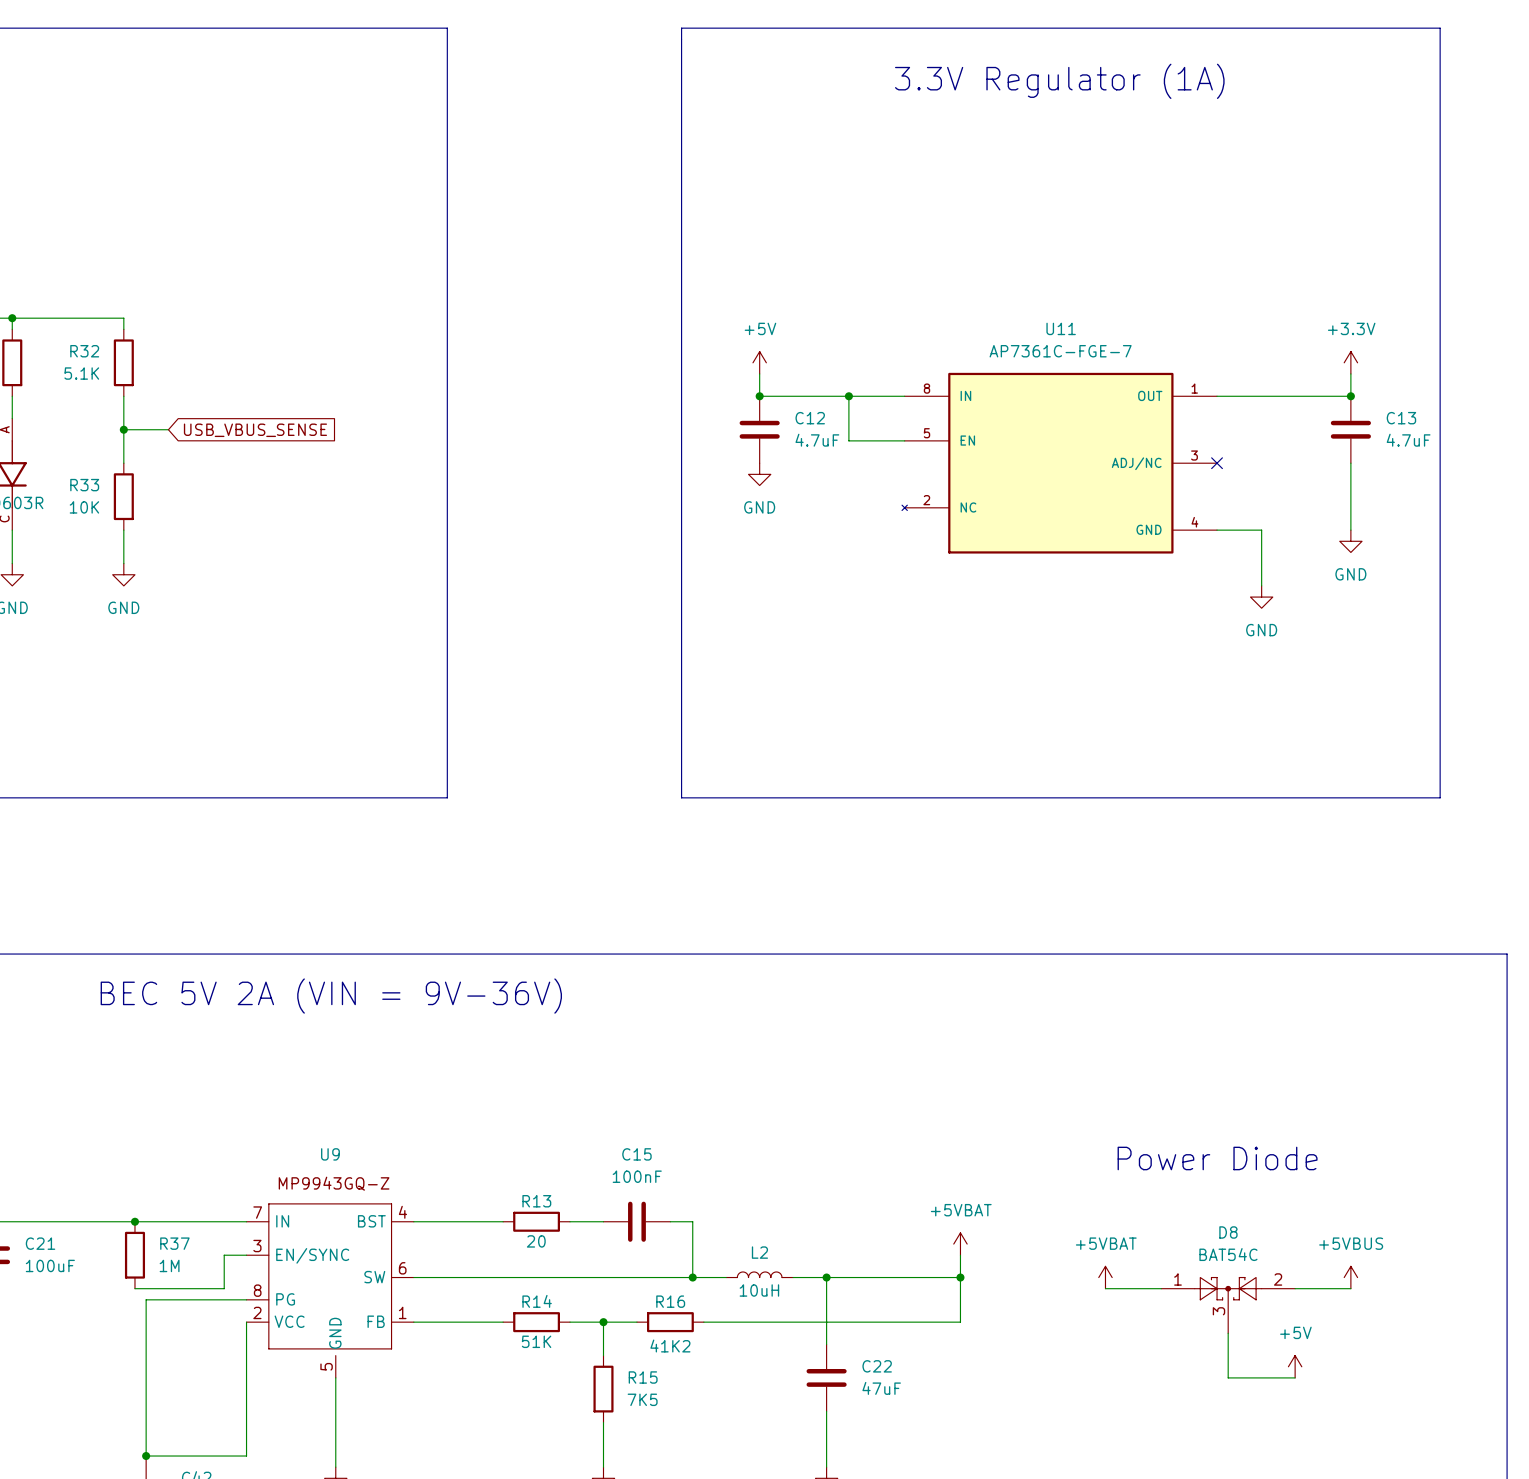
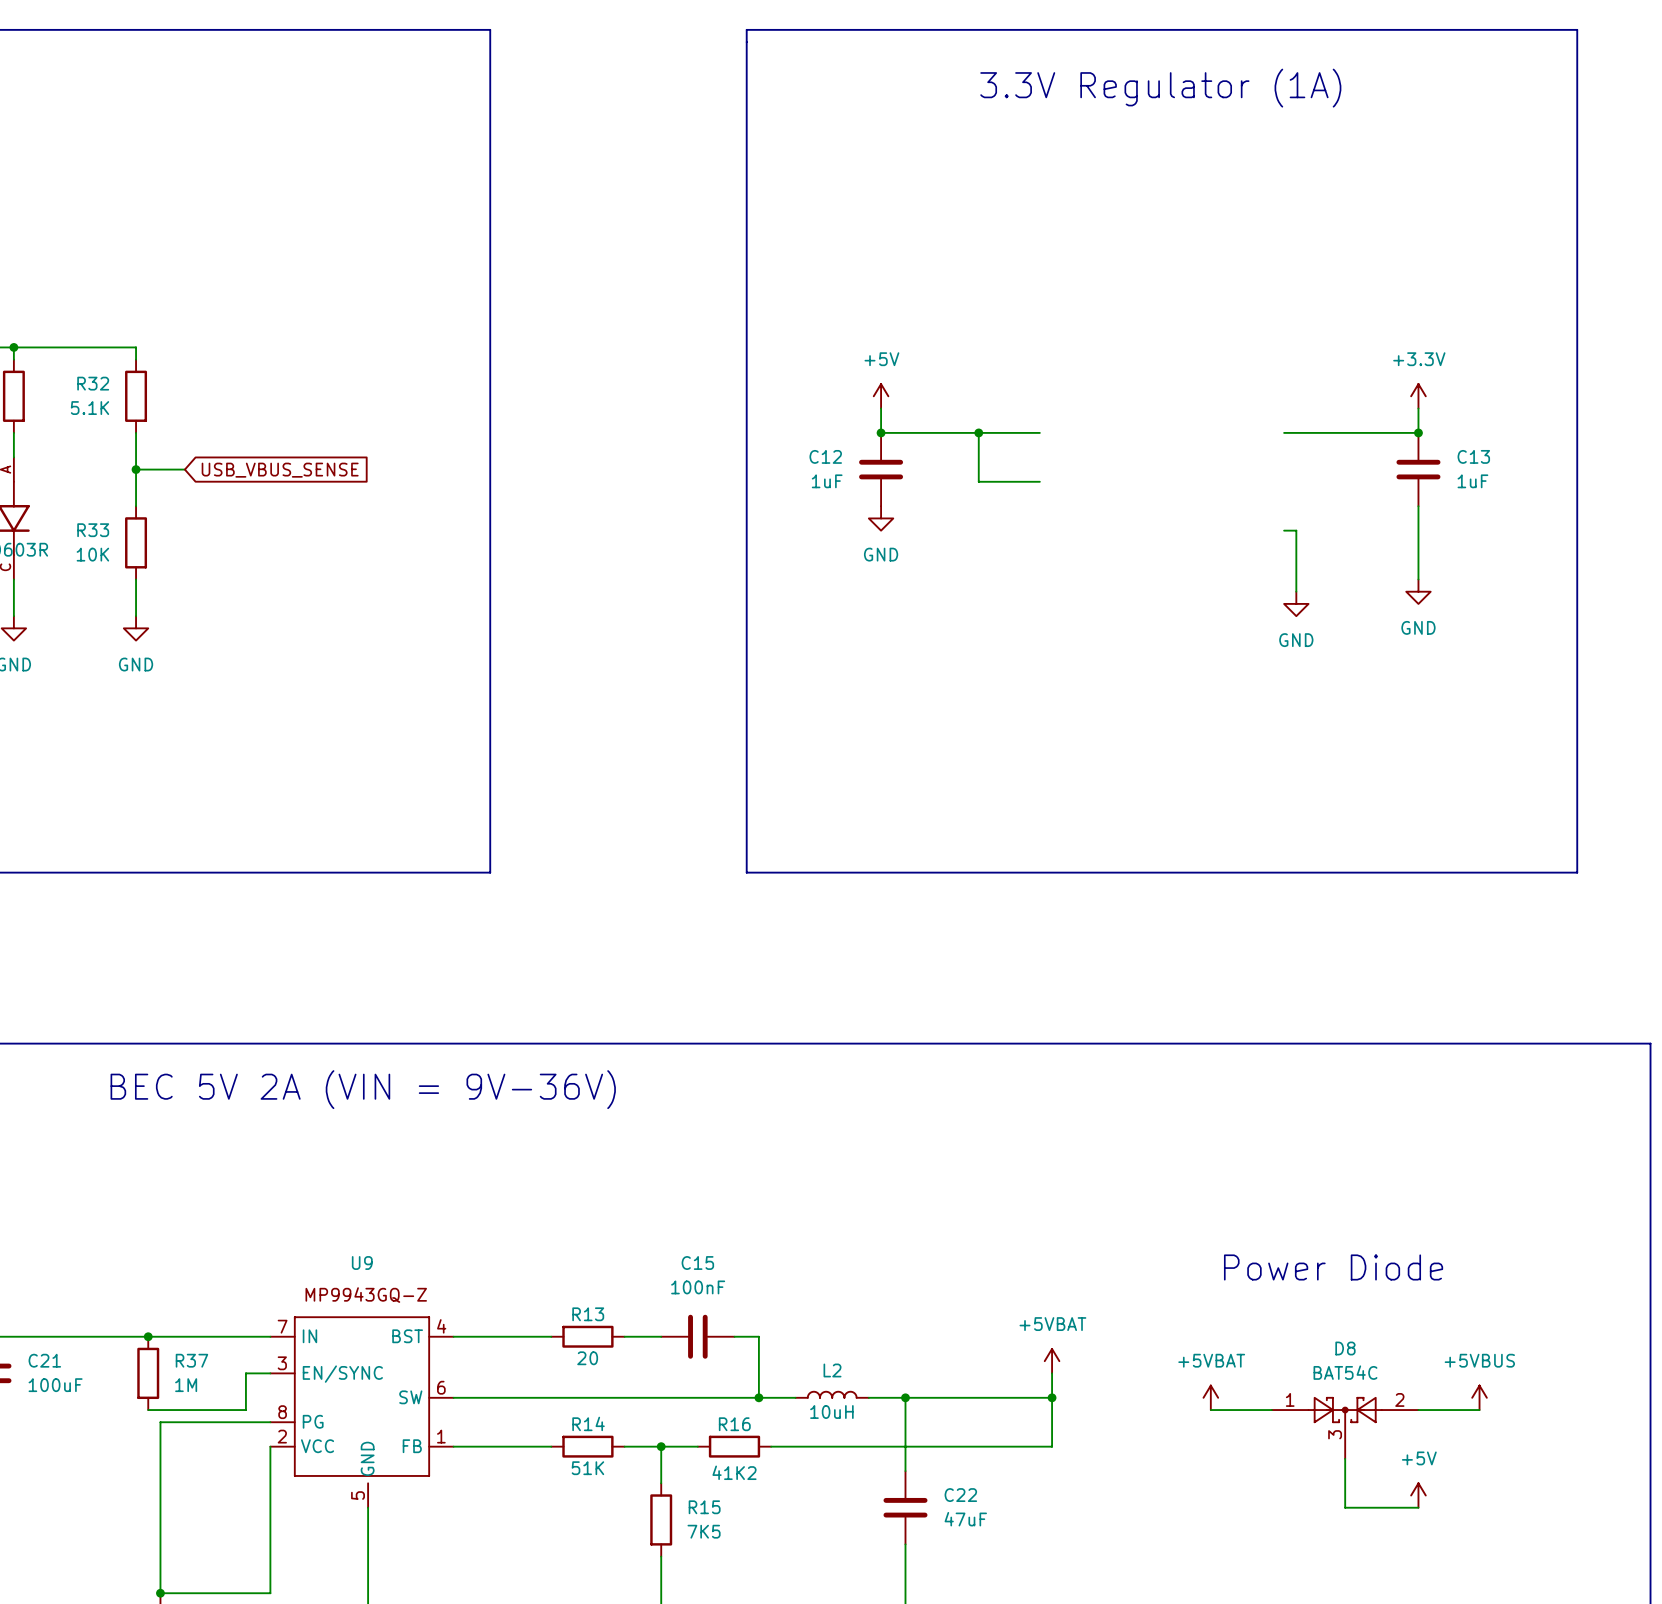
power symbol position: +5V (759, 362) -> +5V (881, 396)
power symbol position: +3.3V (1350, 362) -> +3.3V (1418, 396)
wire: (759, 373) (759, 396) (804, 396) -> (881, 408) (881, 432)
wire: (1350, 373) (1350, 396) (1295, 396) -> (1418, 408) (1418, 432)
junction: (759, 396) -> none
junction: none -> (881, 432)
wire: (848, 396) (848, 440) (893, 440) -> (978, 432) (978, 481)
junction: (848, 396) -> none
junction: none -> (978, 432)
junction: none -> (1418, 432)
junction: (1350, 396) -> none
C12 name position: C12 (810, 418) -> C12 (825, 456)
C12 position: (759, 429) -> (881, 469)
C13 position: (1350, 429) -> (1418, 469)
C12 value: 4.7uF (817, 440) -> 1uF (827, 481)
C13 value: 4.7uF (1408, 440) -> 1uF (1472, 481)
U11: AP7361C-FGE-7 (1059, 463) -> none
no-connect mark: (1217, 463) -> none
wire: (1350, 463) (1350, 530) -> (1418, 506) (1418, 579)
power symbol position: GND (759, 474) -> GND (881, 518)
wire: none -> (1284, 530) (1296, 530) (1296, 591)
wire: (1217, 530) (1261, 530) (1261, 585) -> none
power symbol: none -> GND (1418, 591)
power symbol: GND (1350, 541) -> none
power symbol: none -> GND (1296, 603)
power symbol: GND (1261, 597) -> none

